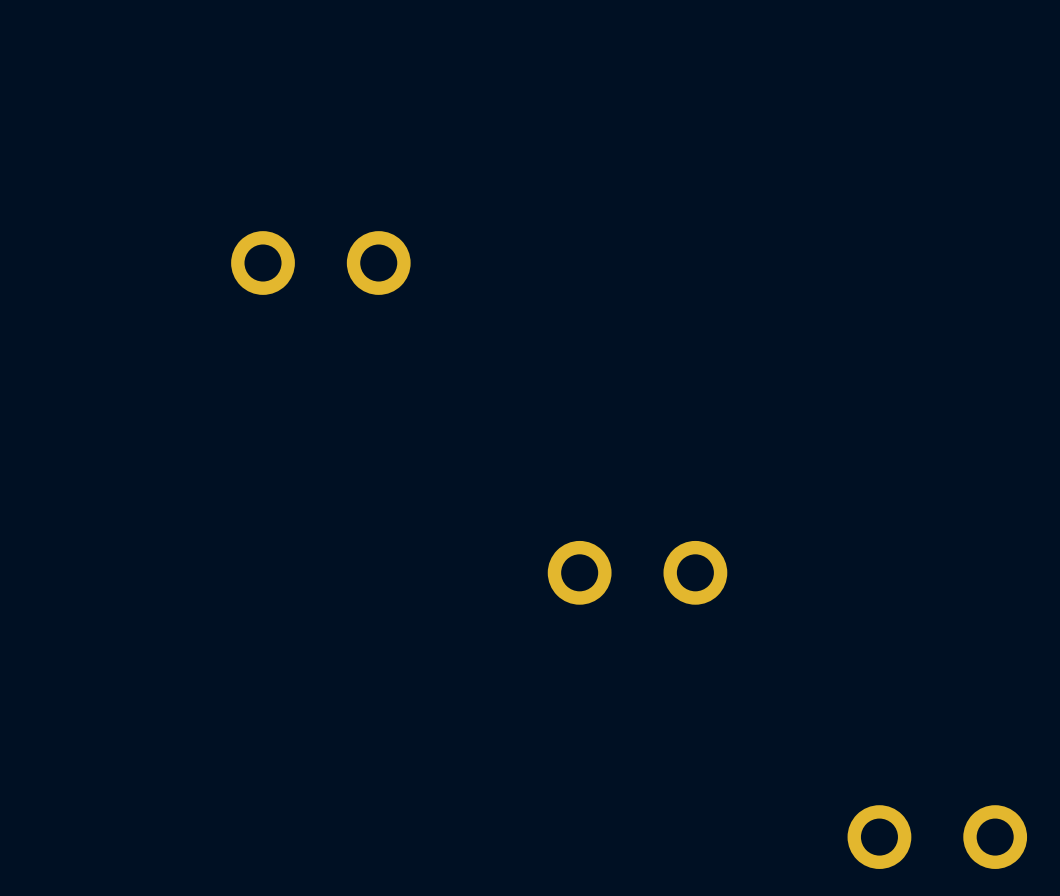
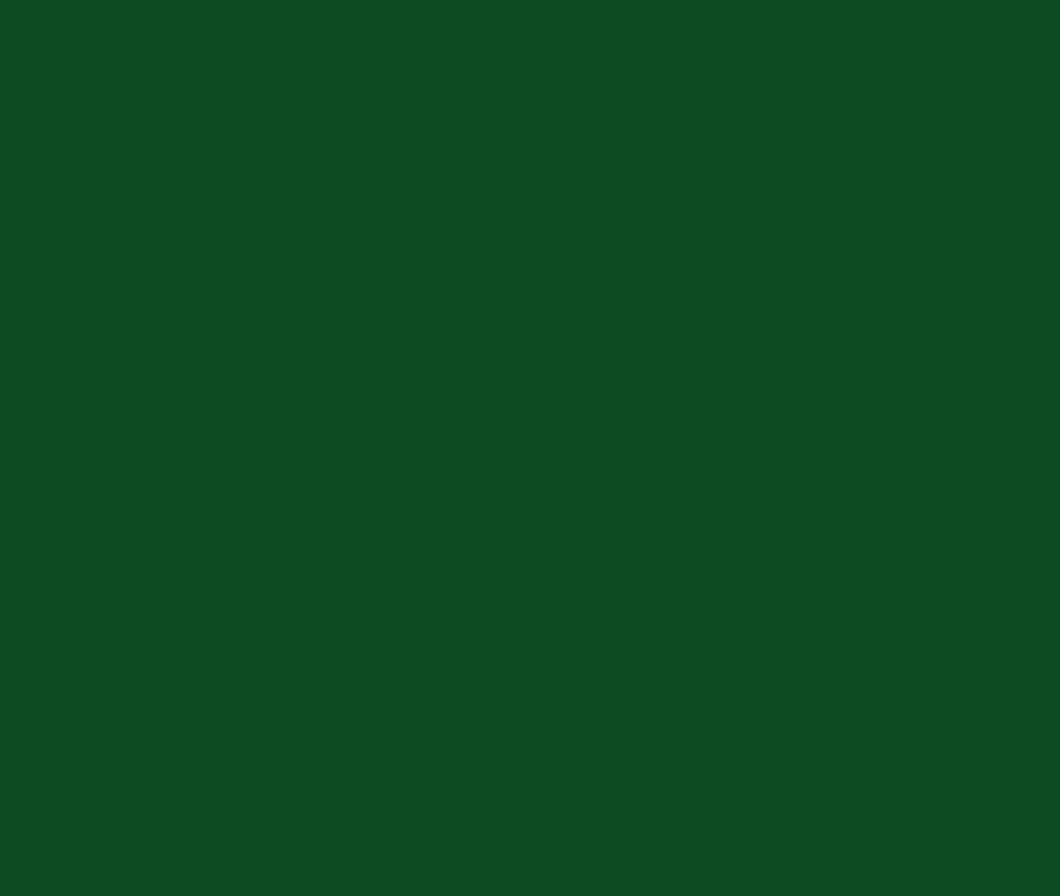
part: (320, 263) -> none
part: (637, 572) -> none
part: (937, 837) -> none

